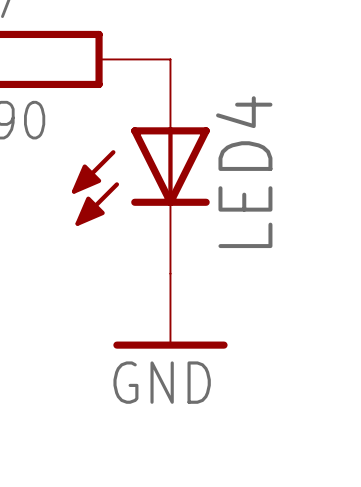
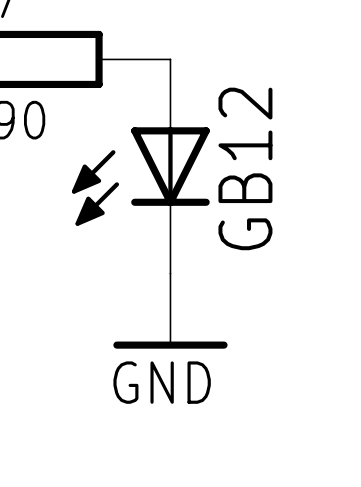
LED4 name: LED4 (244, 172) -> GB12 (245, 168)

